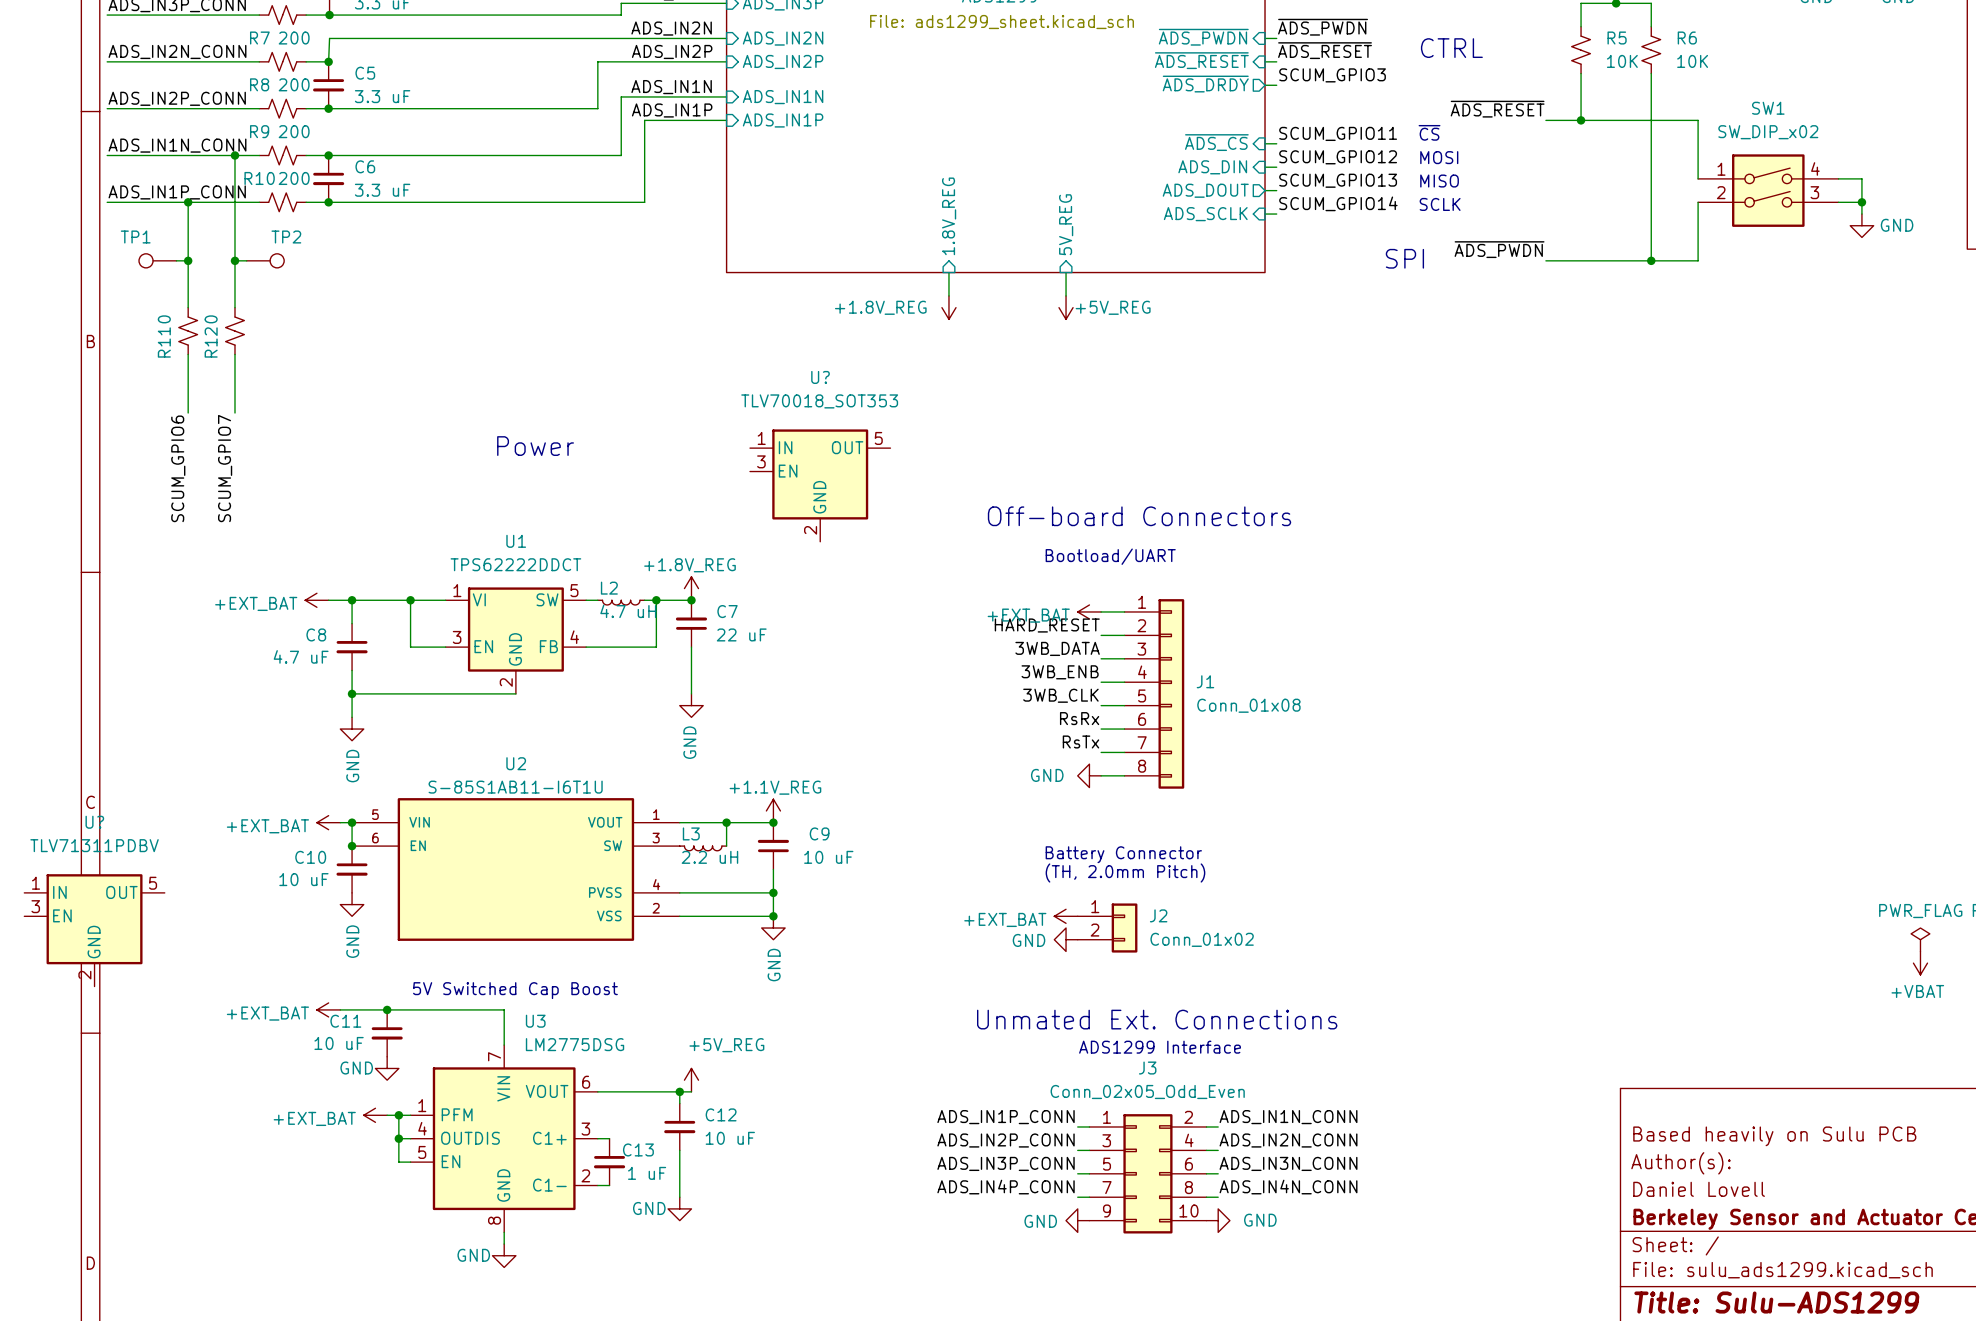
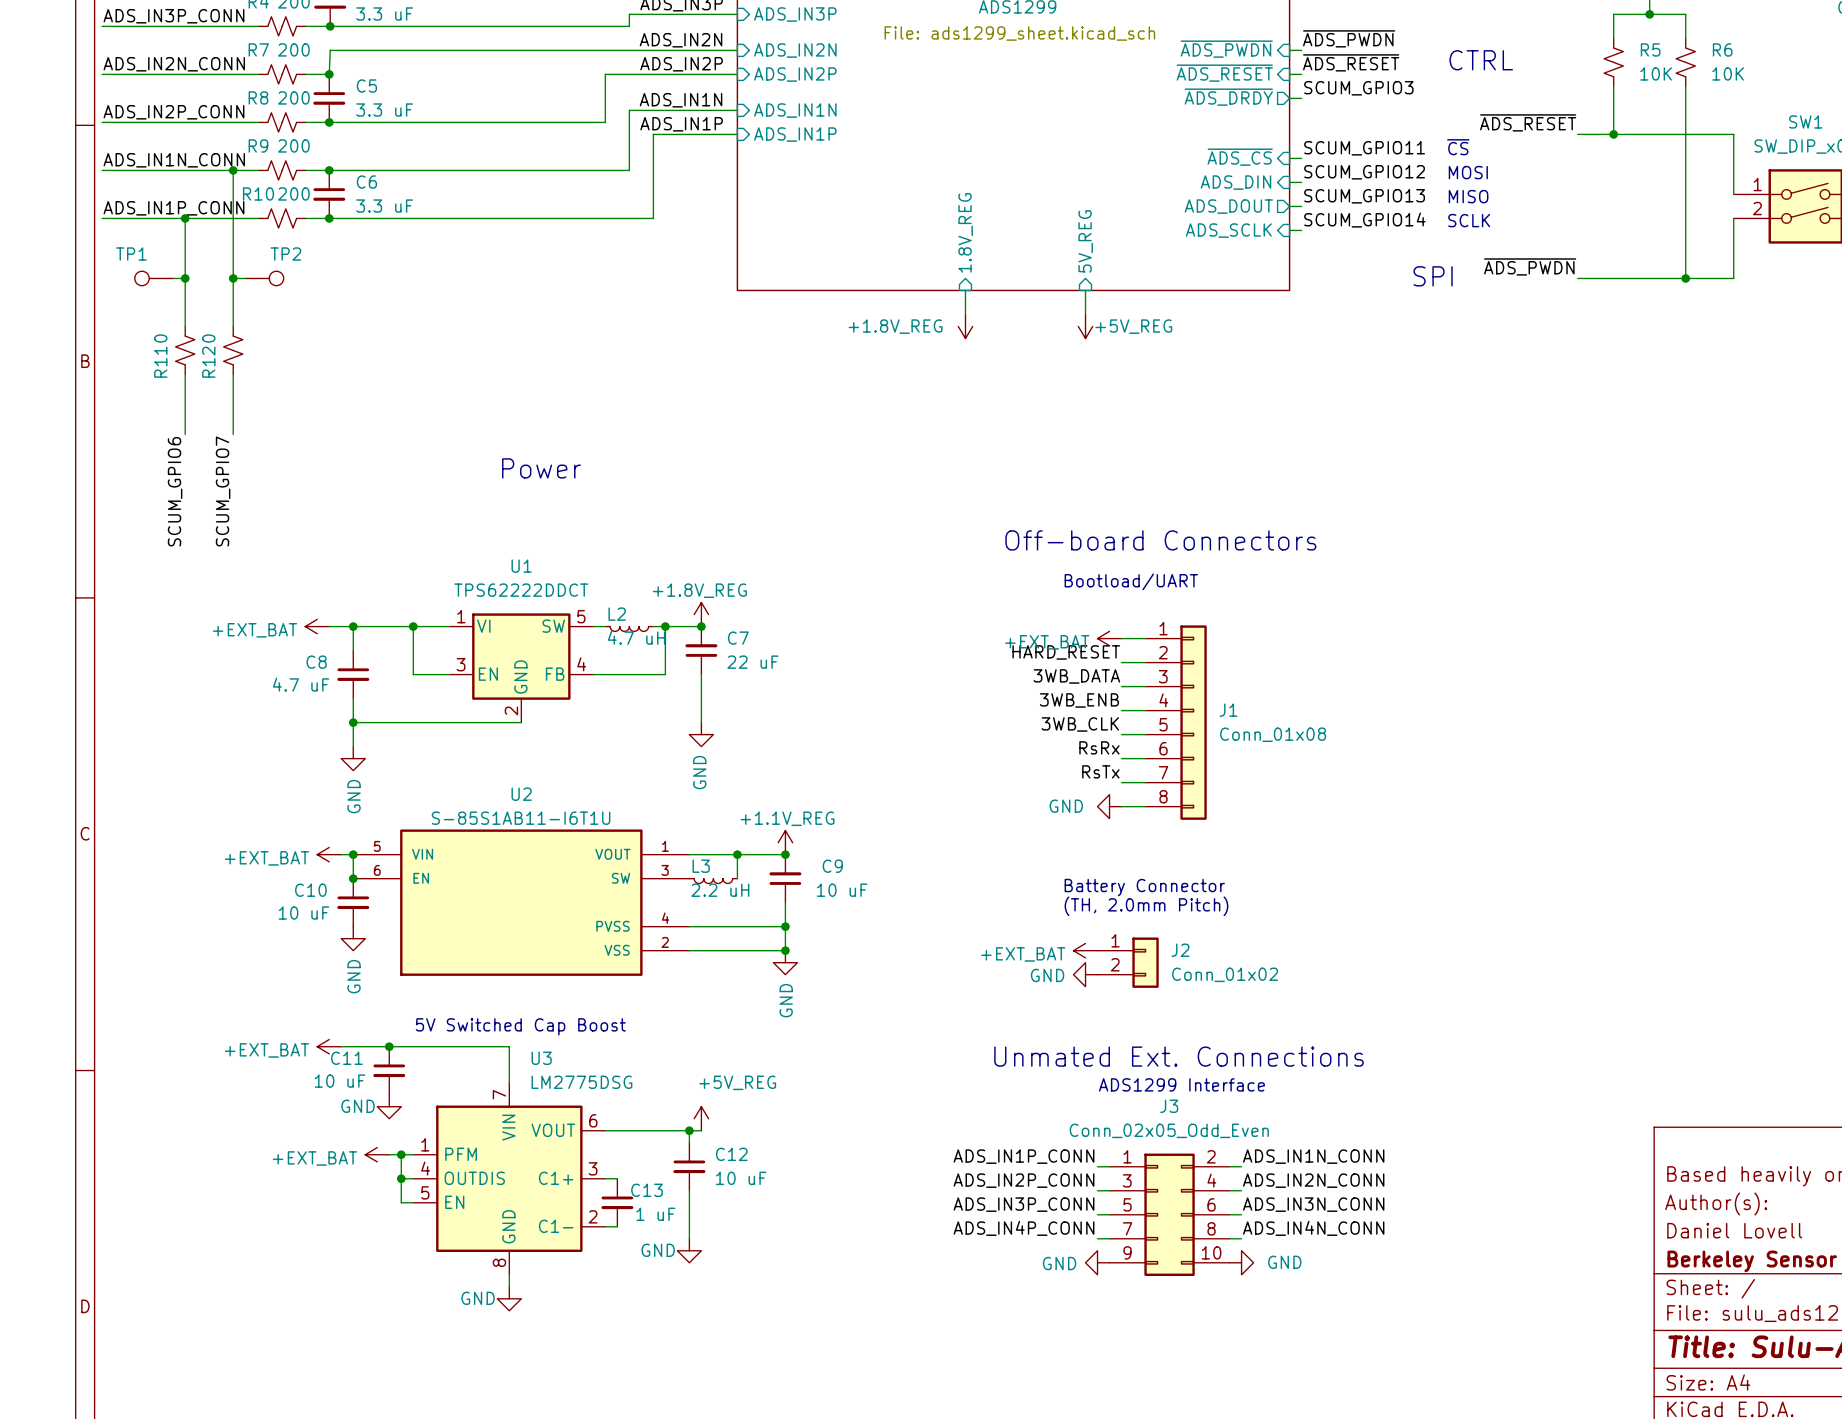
U?: TLV70018_SOT353 (820, 485) -> none
U?: TLV71311PDBV (94, 930) -> none

